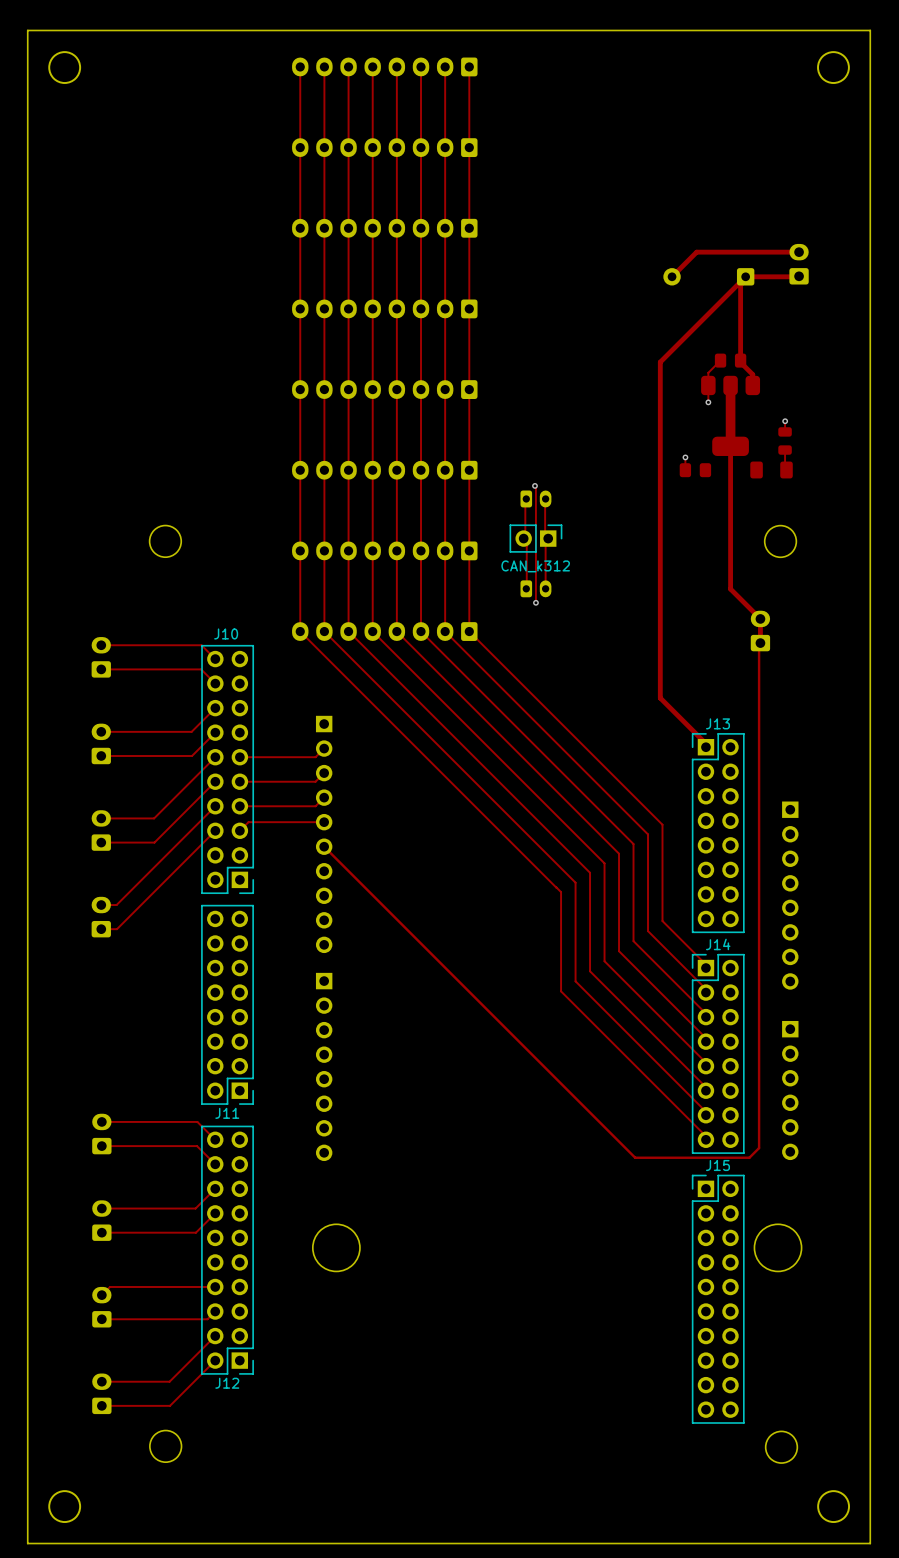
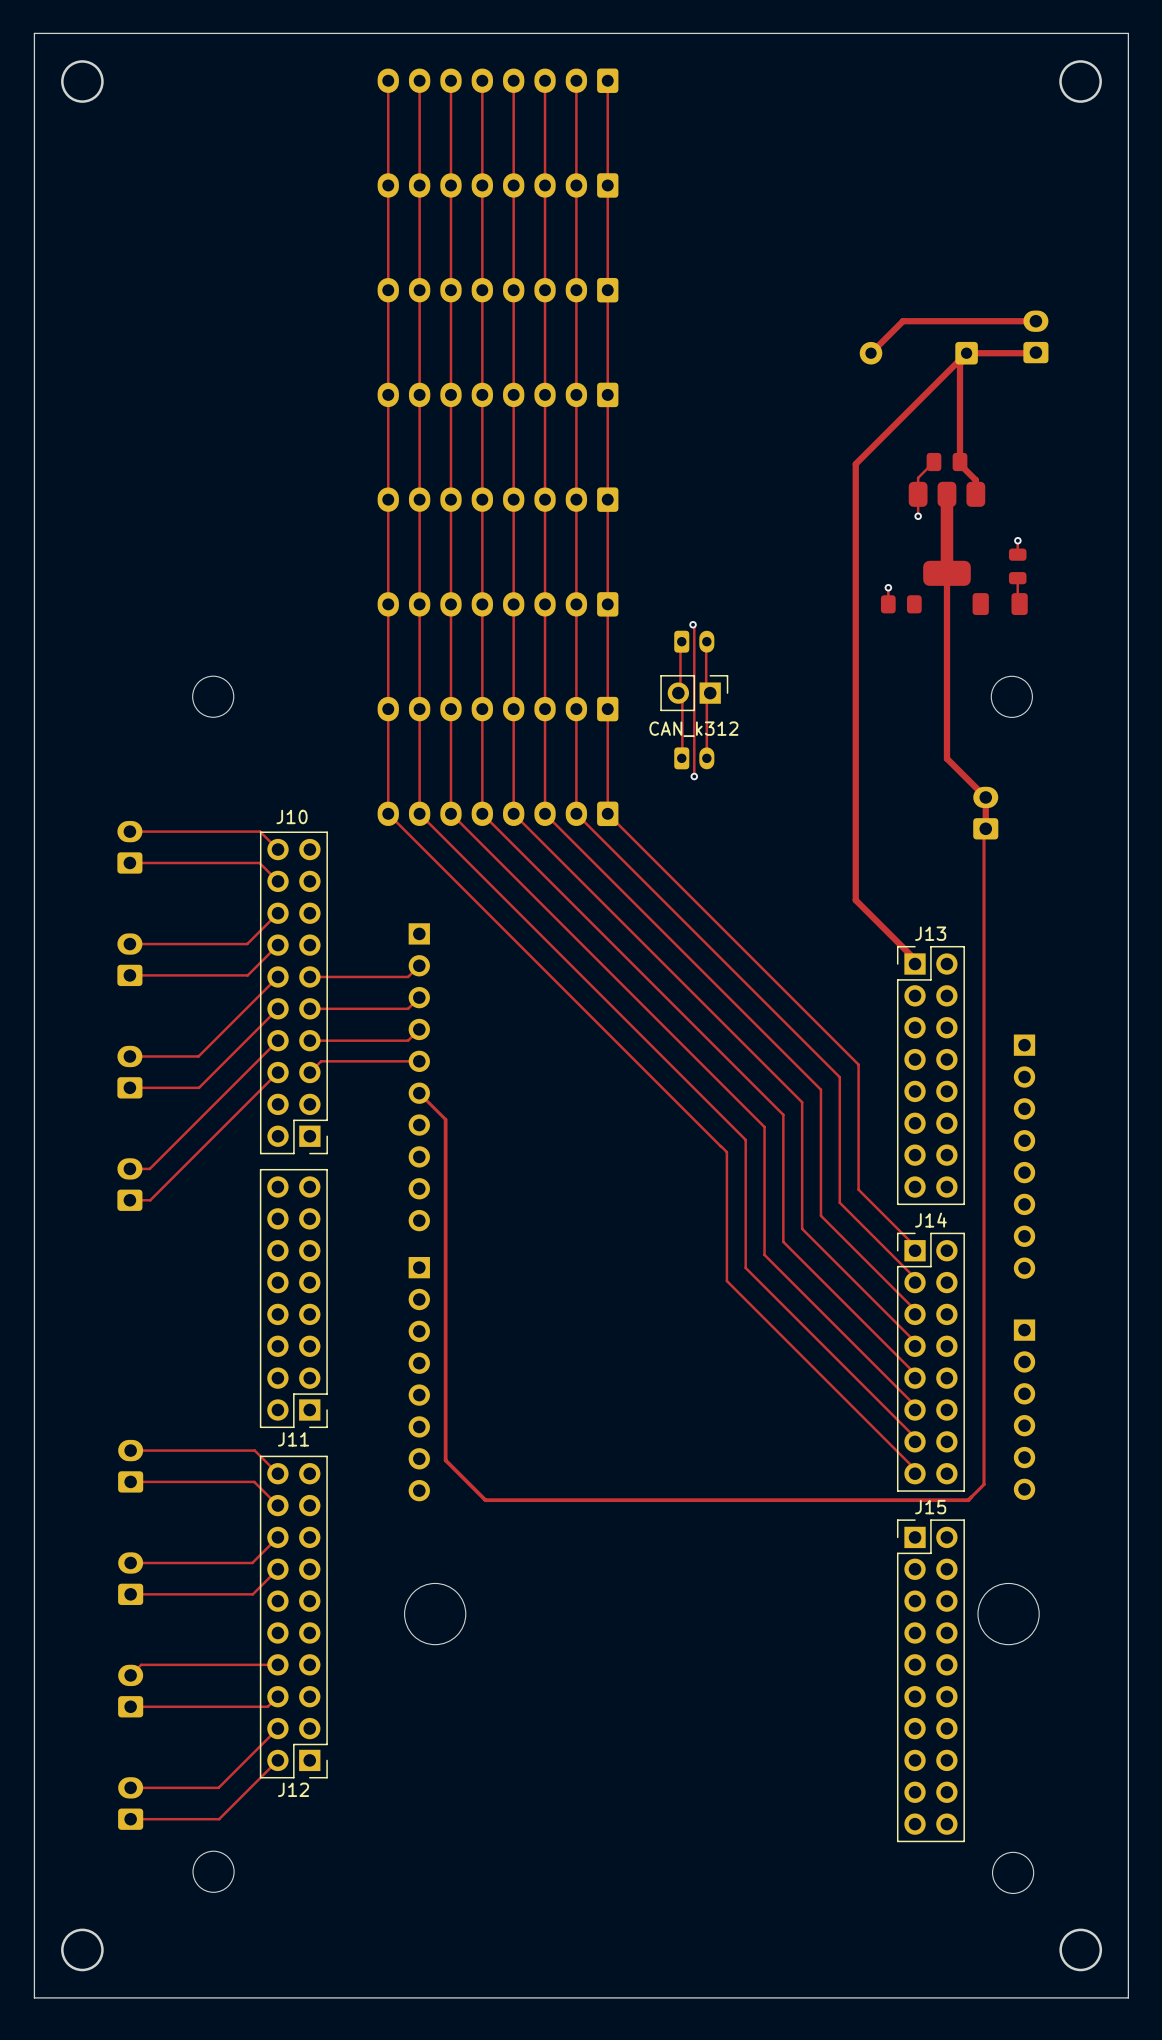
top track: (344, 866) (635, 1157) (749, 1157) -> (445, 1119) (445, 1460) (485, 1500) (968, 1500) (971, 1497)

